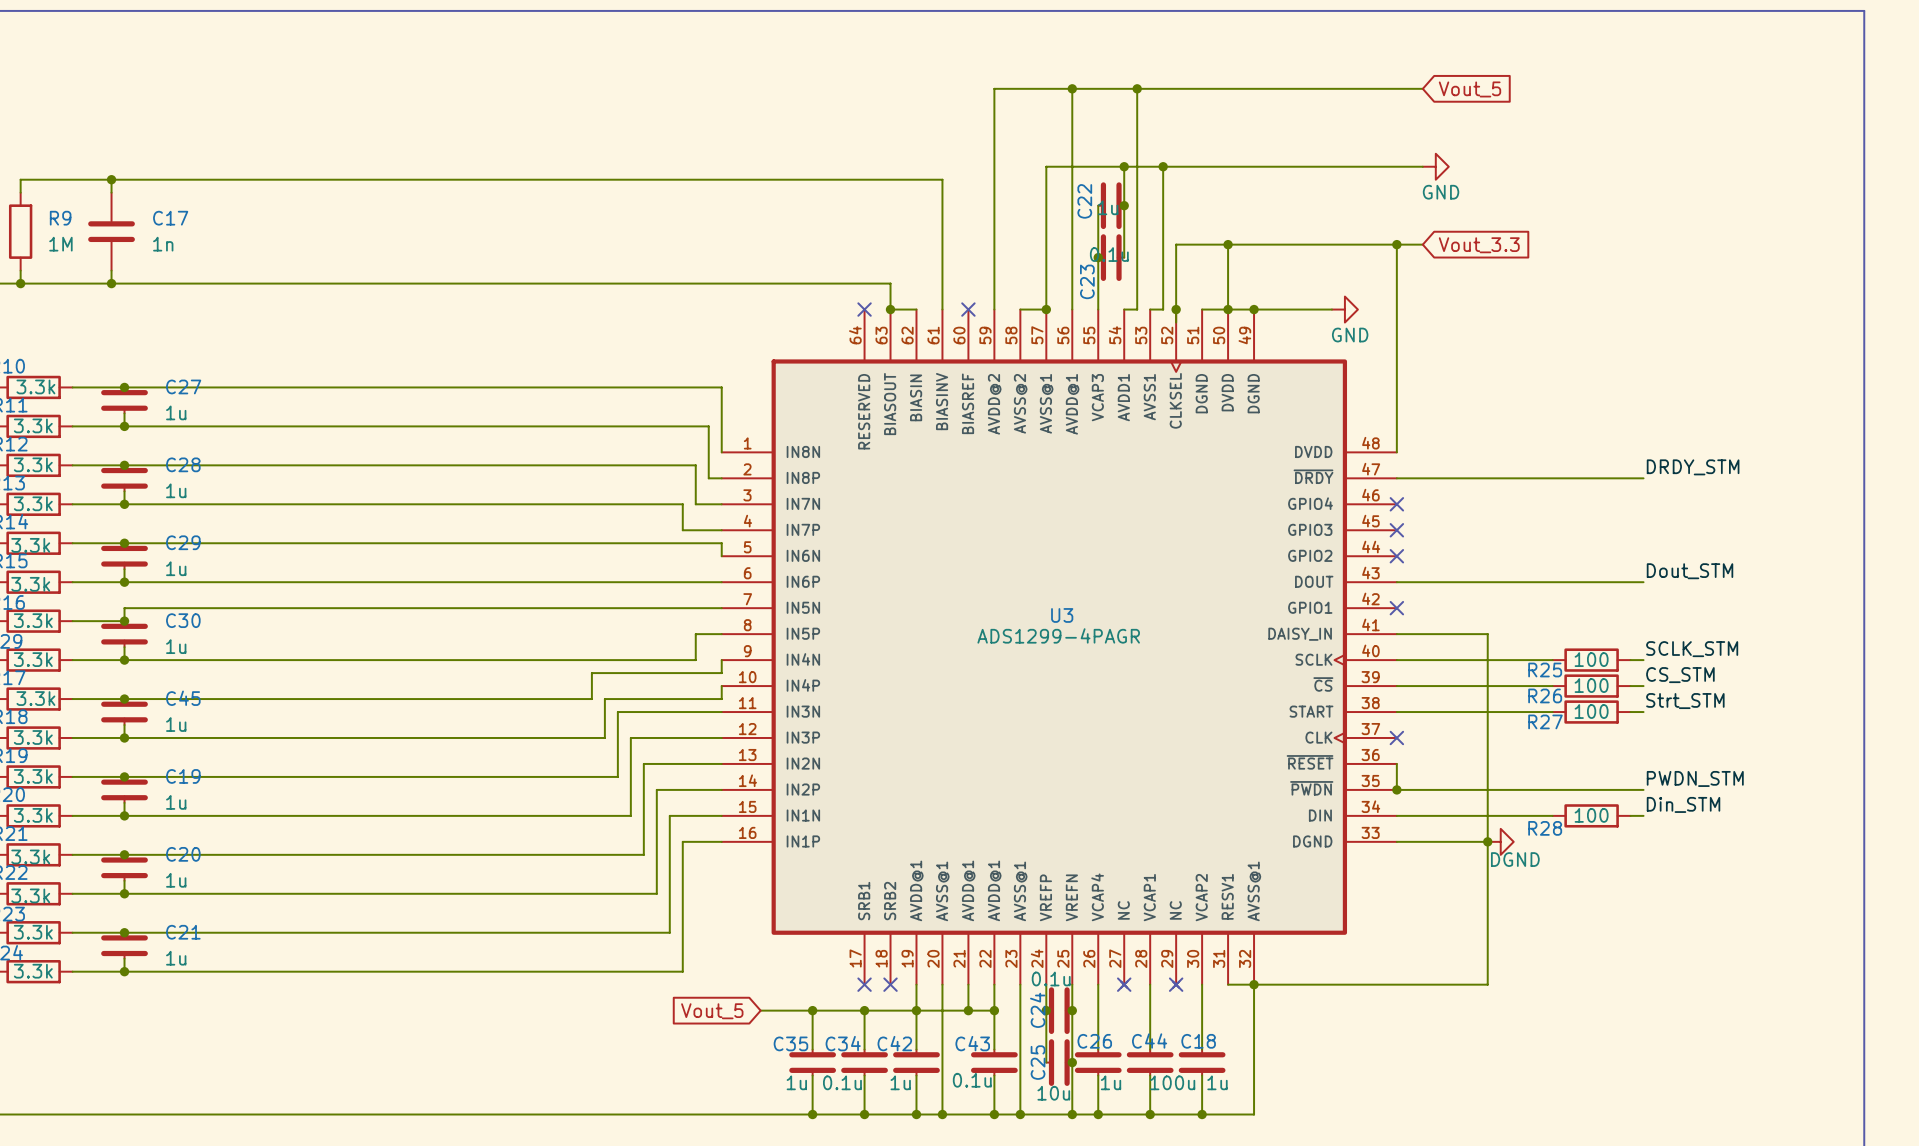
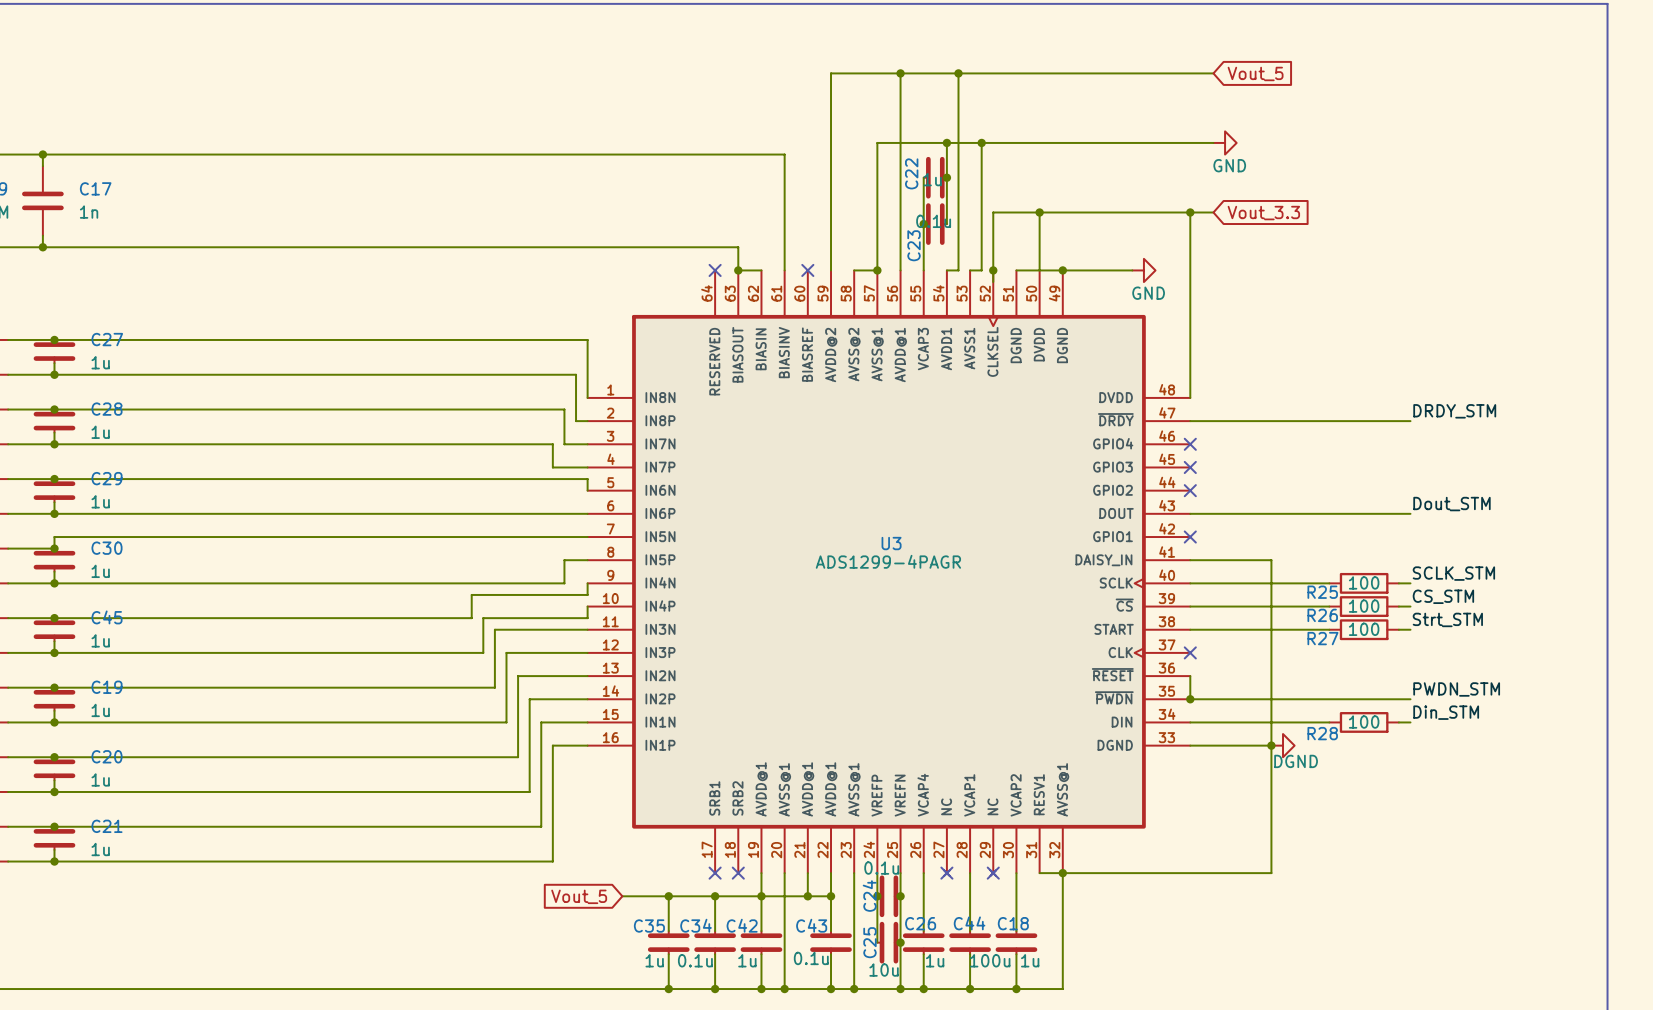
junction: (1228, 309) -> none

